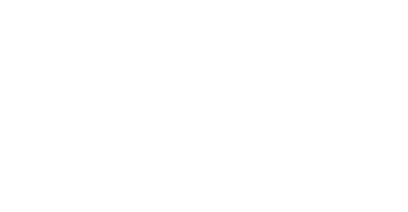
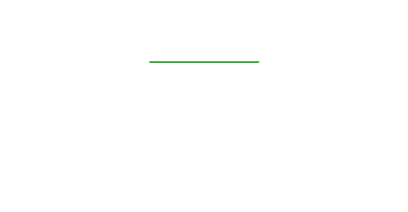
wire: none -> (149, 62) (258, 62)

